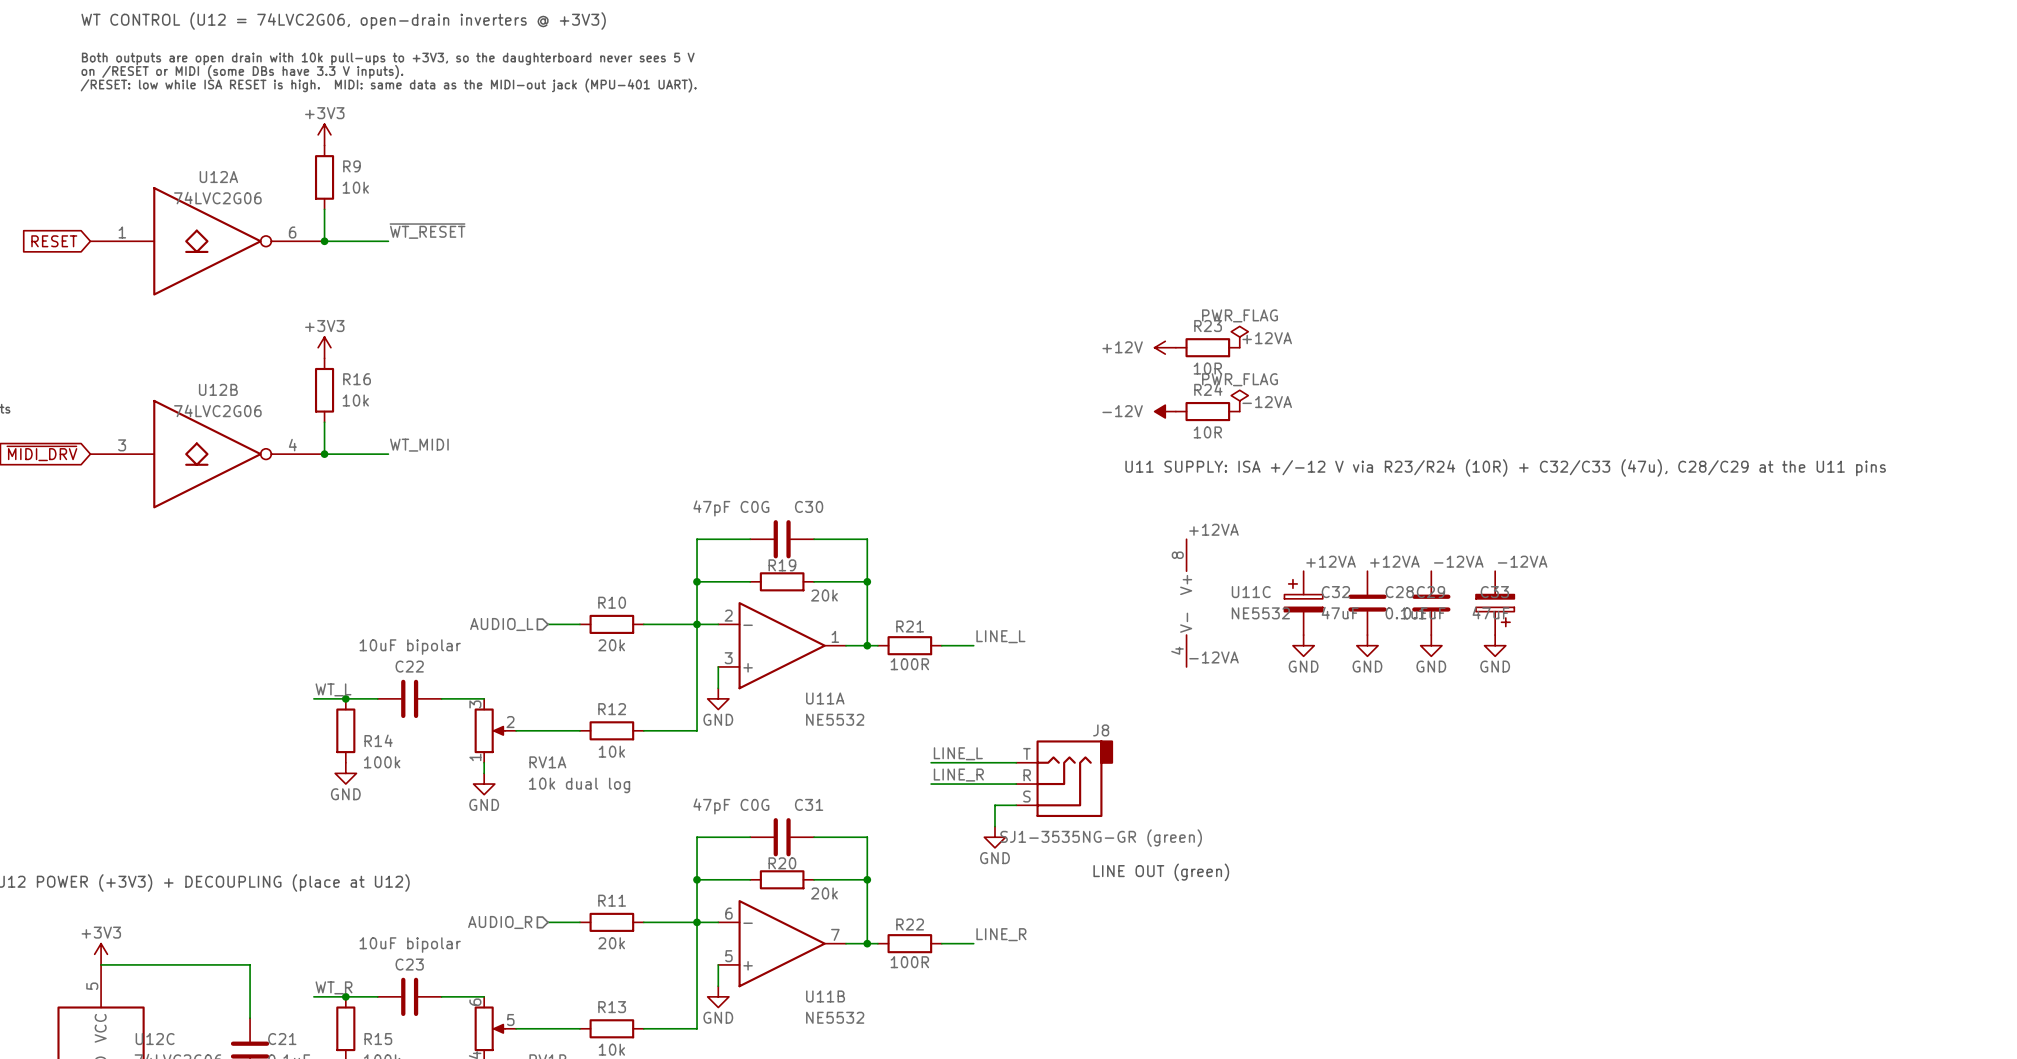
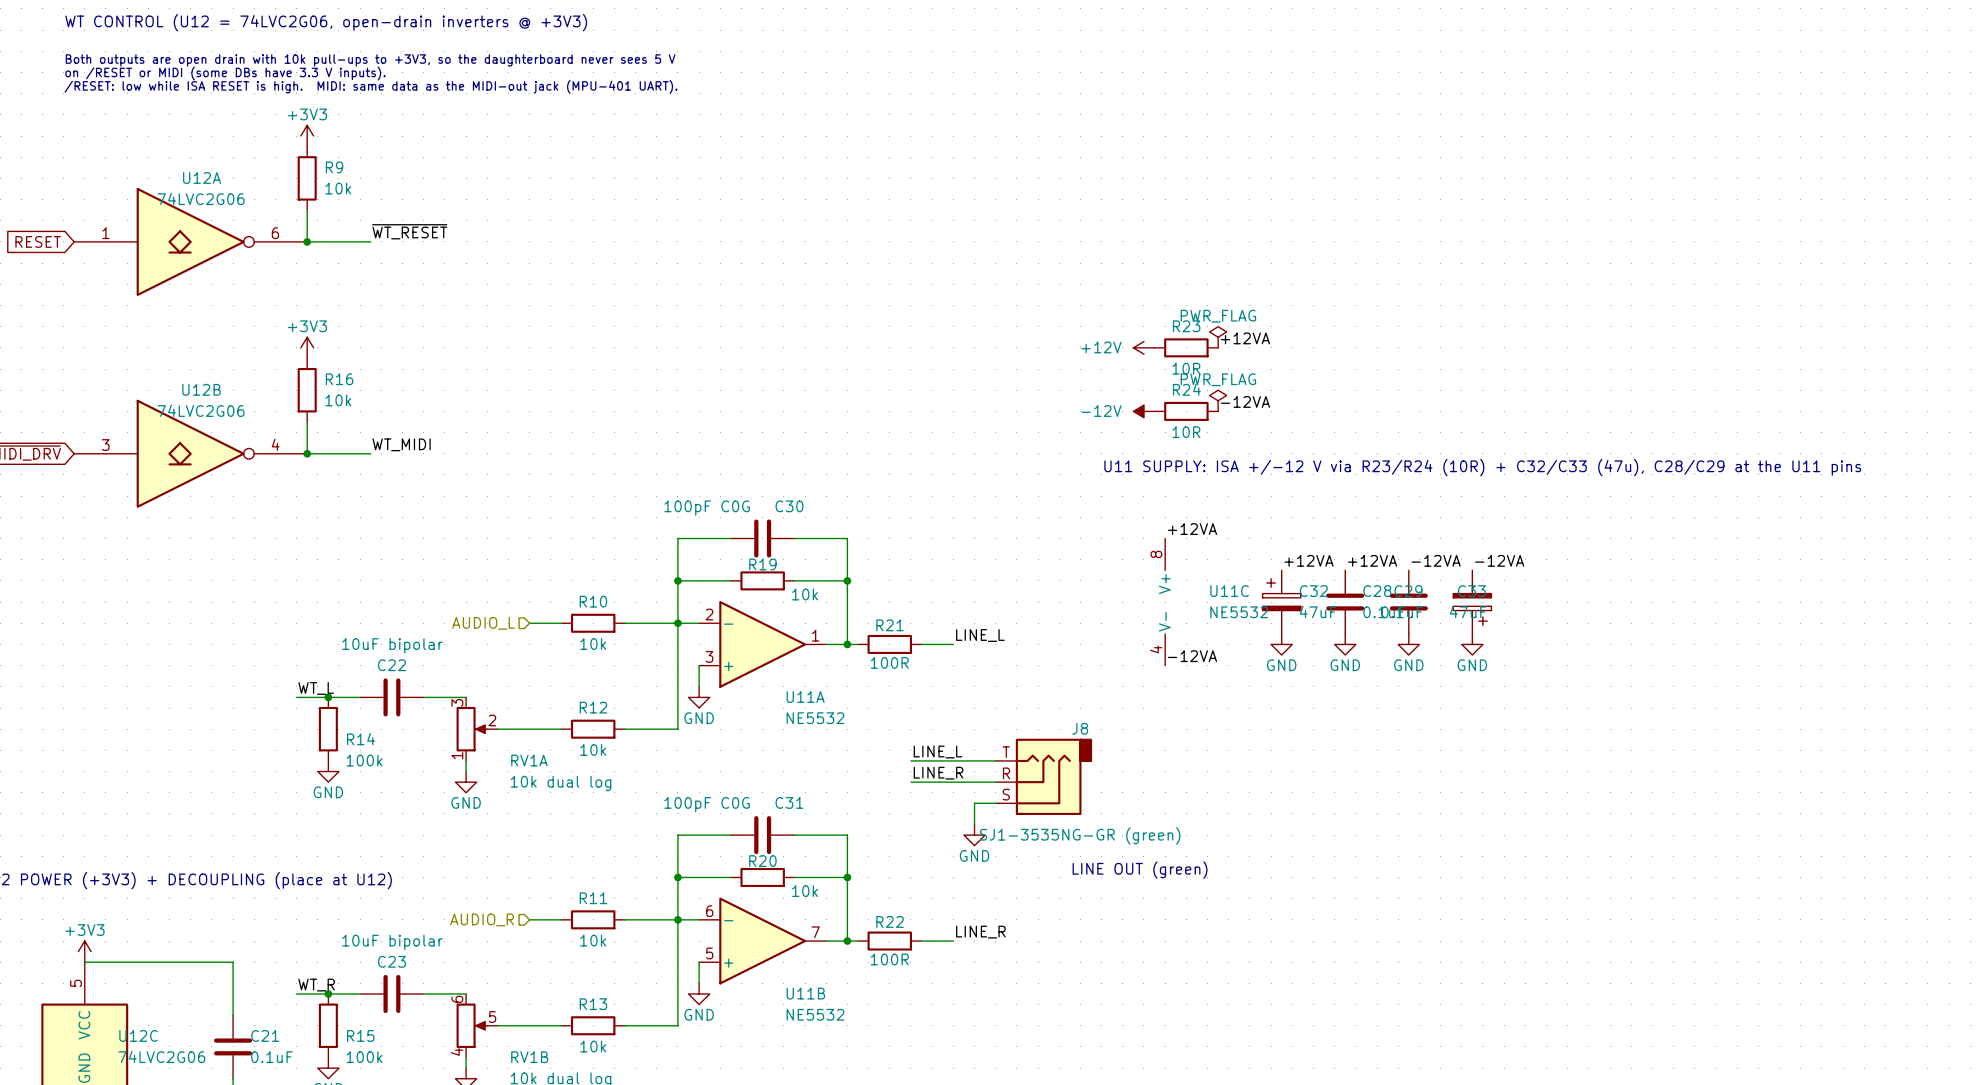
C30 value: 47pF C0G (731, 508) -> 100pF C0G (707, 508)
R19 value: 20k (824, 595) -> 10k (805, 594)
R10 value: 20k (611, 645) -> 10k (593, 644)
C31 value: 47pF C0G (731, 806) -> 100pF C0G (707, 804)
R20 value: 20k (824, 893) -> 10k (805, 891)
R11 value: 20k (611, 943) -> 10k (593, 940)

